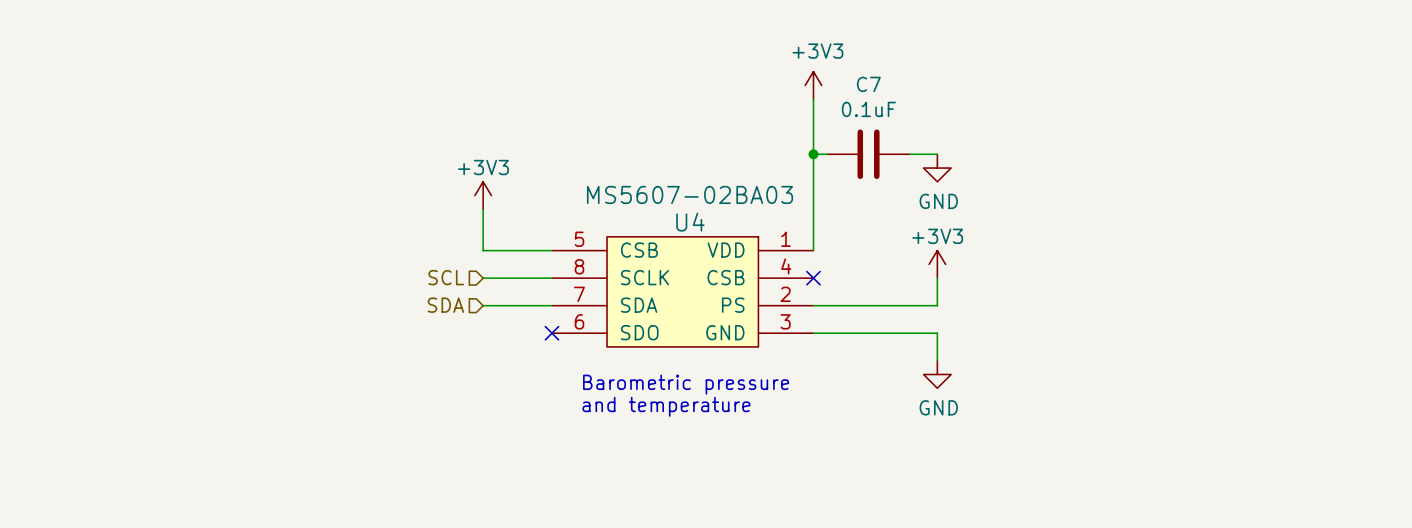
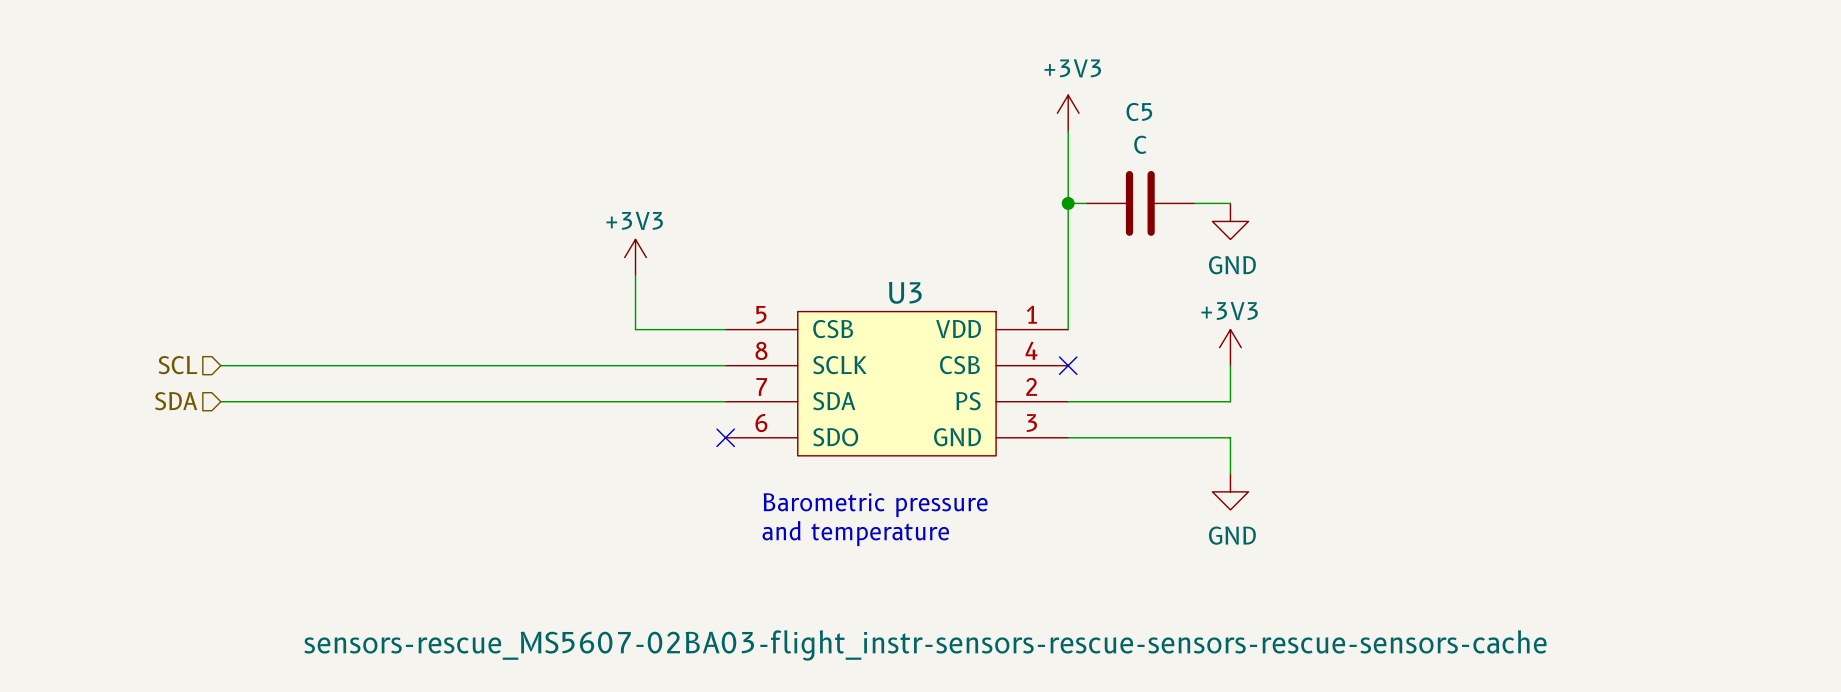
C7 name: C7 (868, 84) -> C5 (1139, 112)
C7 value: 0.1uF (868, 109) -> C (1140, 144)
U4 value: MS5607-02BA03 (690, 194) -> sensors-rescue_MS5607-02BA03-flight_instr-sensors-rescue-sensors-rescue-sensors-cache (925, 645)
U4 name: U4 (690, 222) -> U3 (905, 292)
hierarchical label: none -> SCL (177, 365)
hierarchical label: SCL (446, 277) -> none
wire: none -> (220, 365) (635, 365)
hierarchical label: none -> SDA (176, 401)
wire: none -> (220, 401) (635, 401)
hierarchical label: SDA (445, 305) -> none

